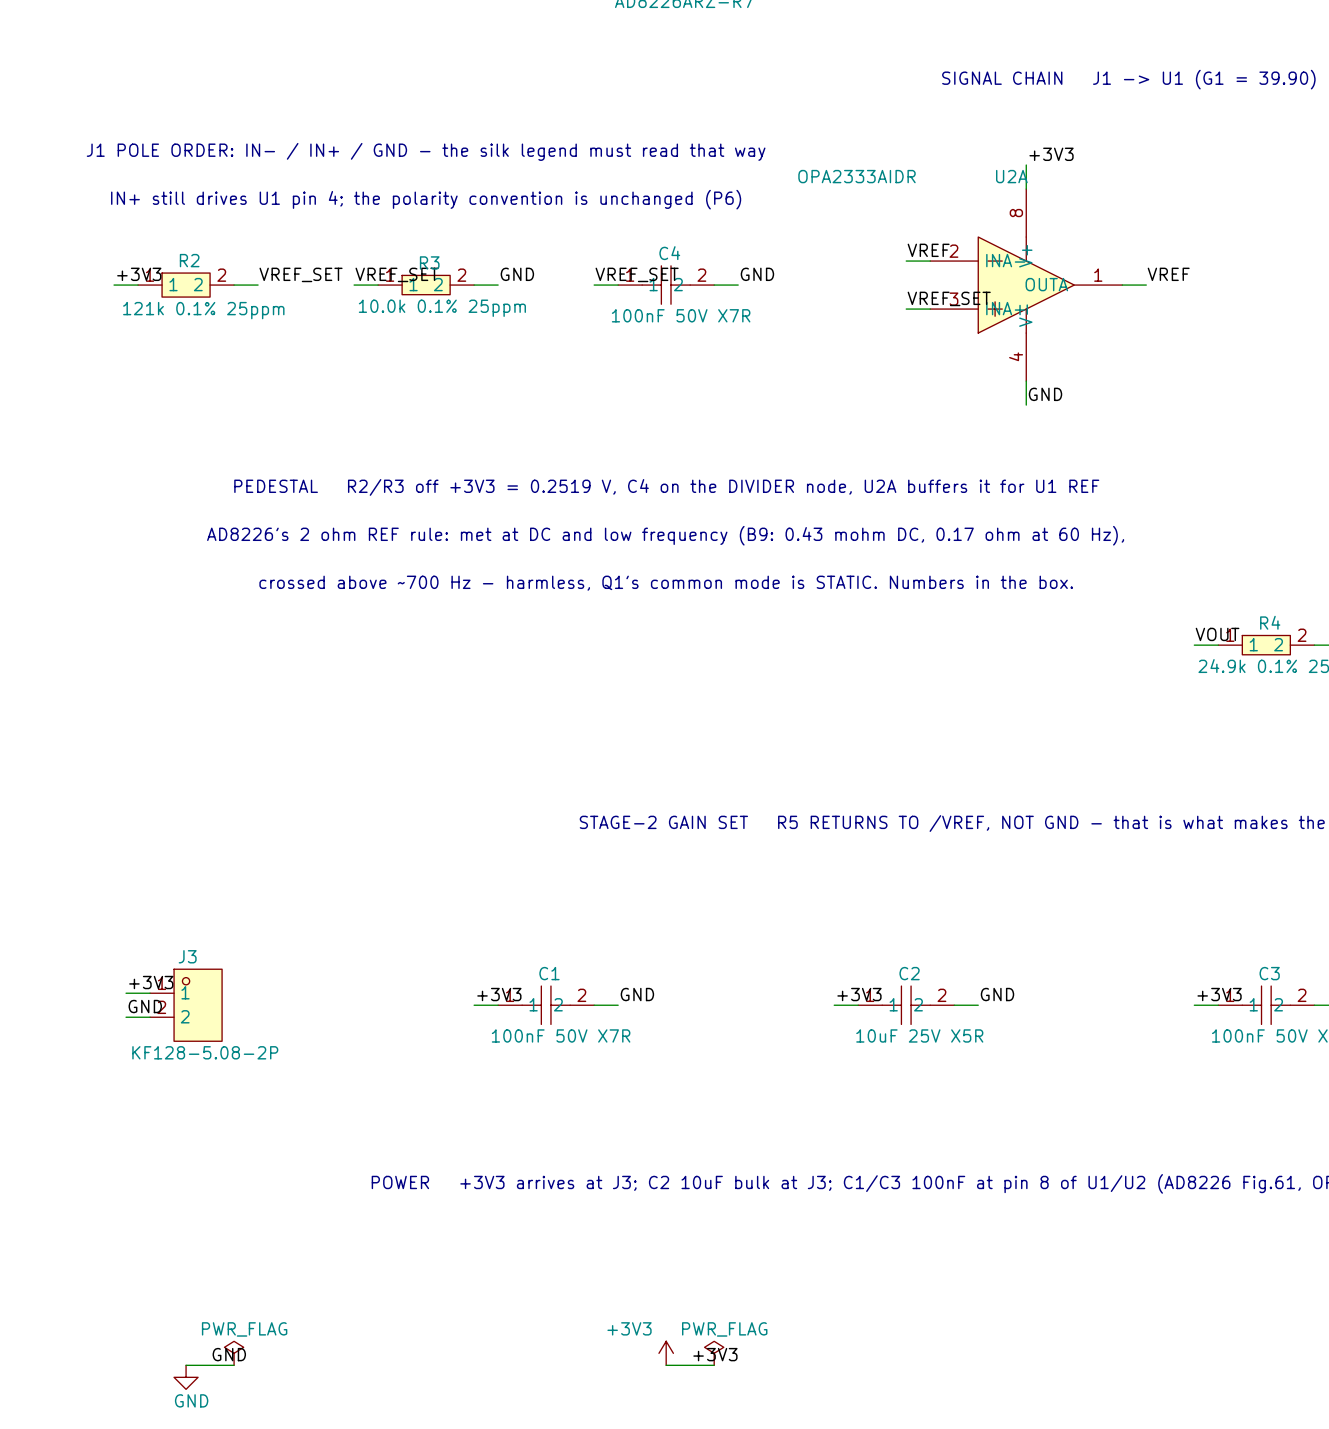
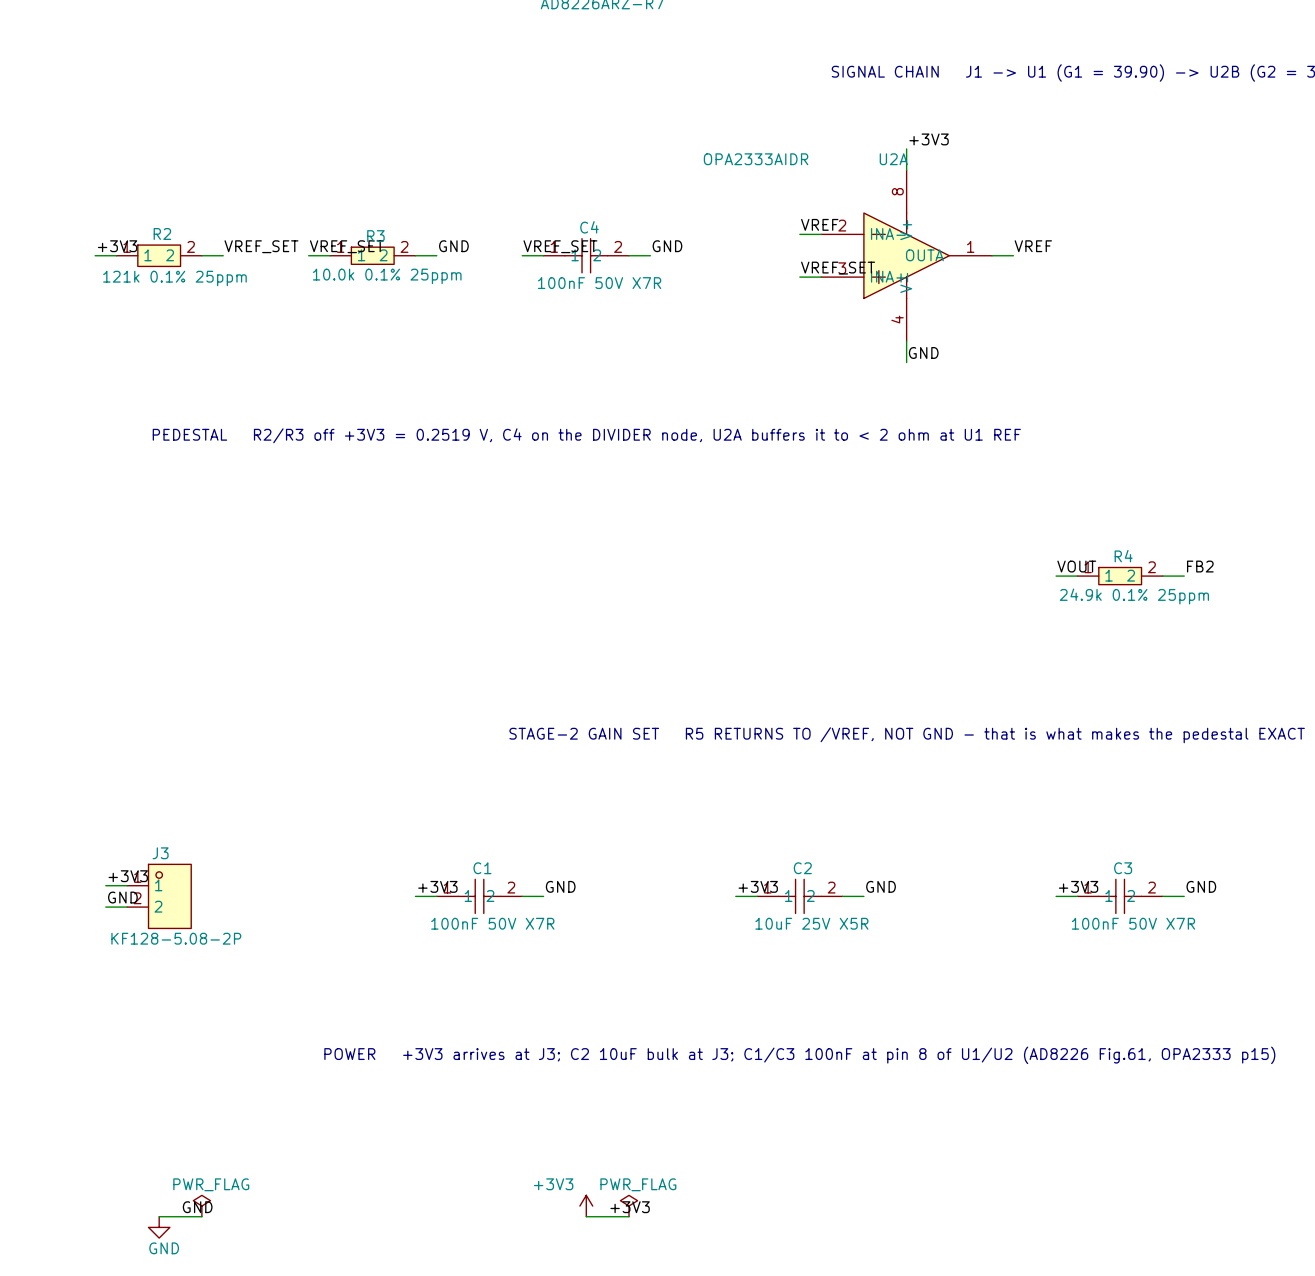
text: J1 POLE ORDER: IN- / IN+ / GND - the silk legend must read that way (426, 151) -> none
text: IN+ still drives U1 pin 4; the polarity convention is unchanged (P6) (426, 199) -> none
text: PEDESTAL R2/R3 off +3V3 = 0.2519 V, C4 on the DIVIDER node, U2A buffers it for U1 REF (666, 487) -> PEDESTAL R2/R3 off +3V3 = 0.2519 V, C4 on the DIVIDER node, U2A buffers it to < 2 ohm at U1 REF (586, 435)
text: AD8226's 2 ohm REF rule: met at DC and low frequency (B9: 0.43 mohm DC, 0.17 ohm at 60 Hz), (665, 535) -> none
text: crossed above ~700 Hz - harmless, Q1's common mode is STATIC. Numbers in the box. (666, 583) -> none

